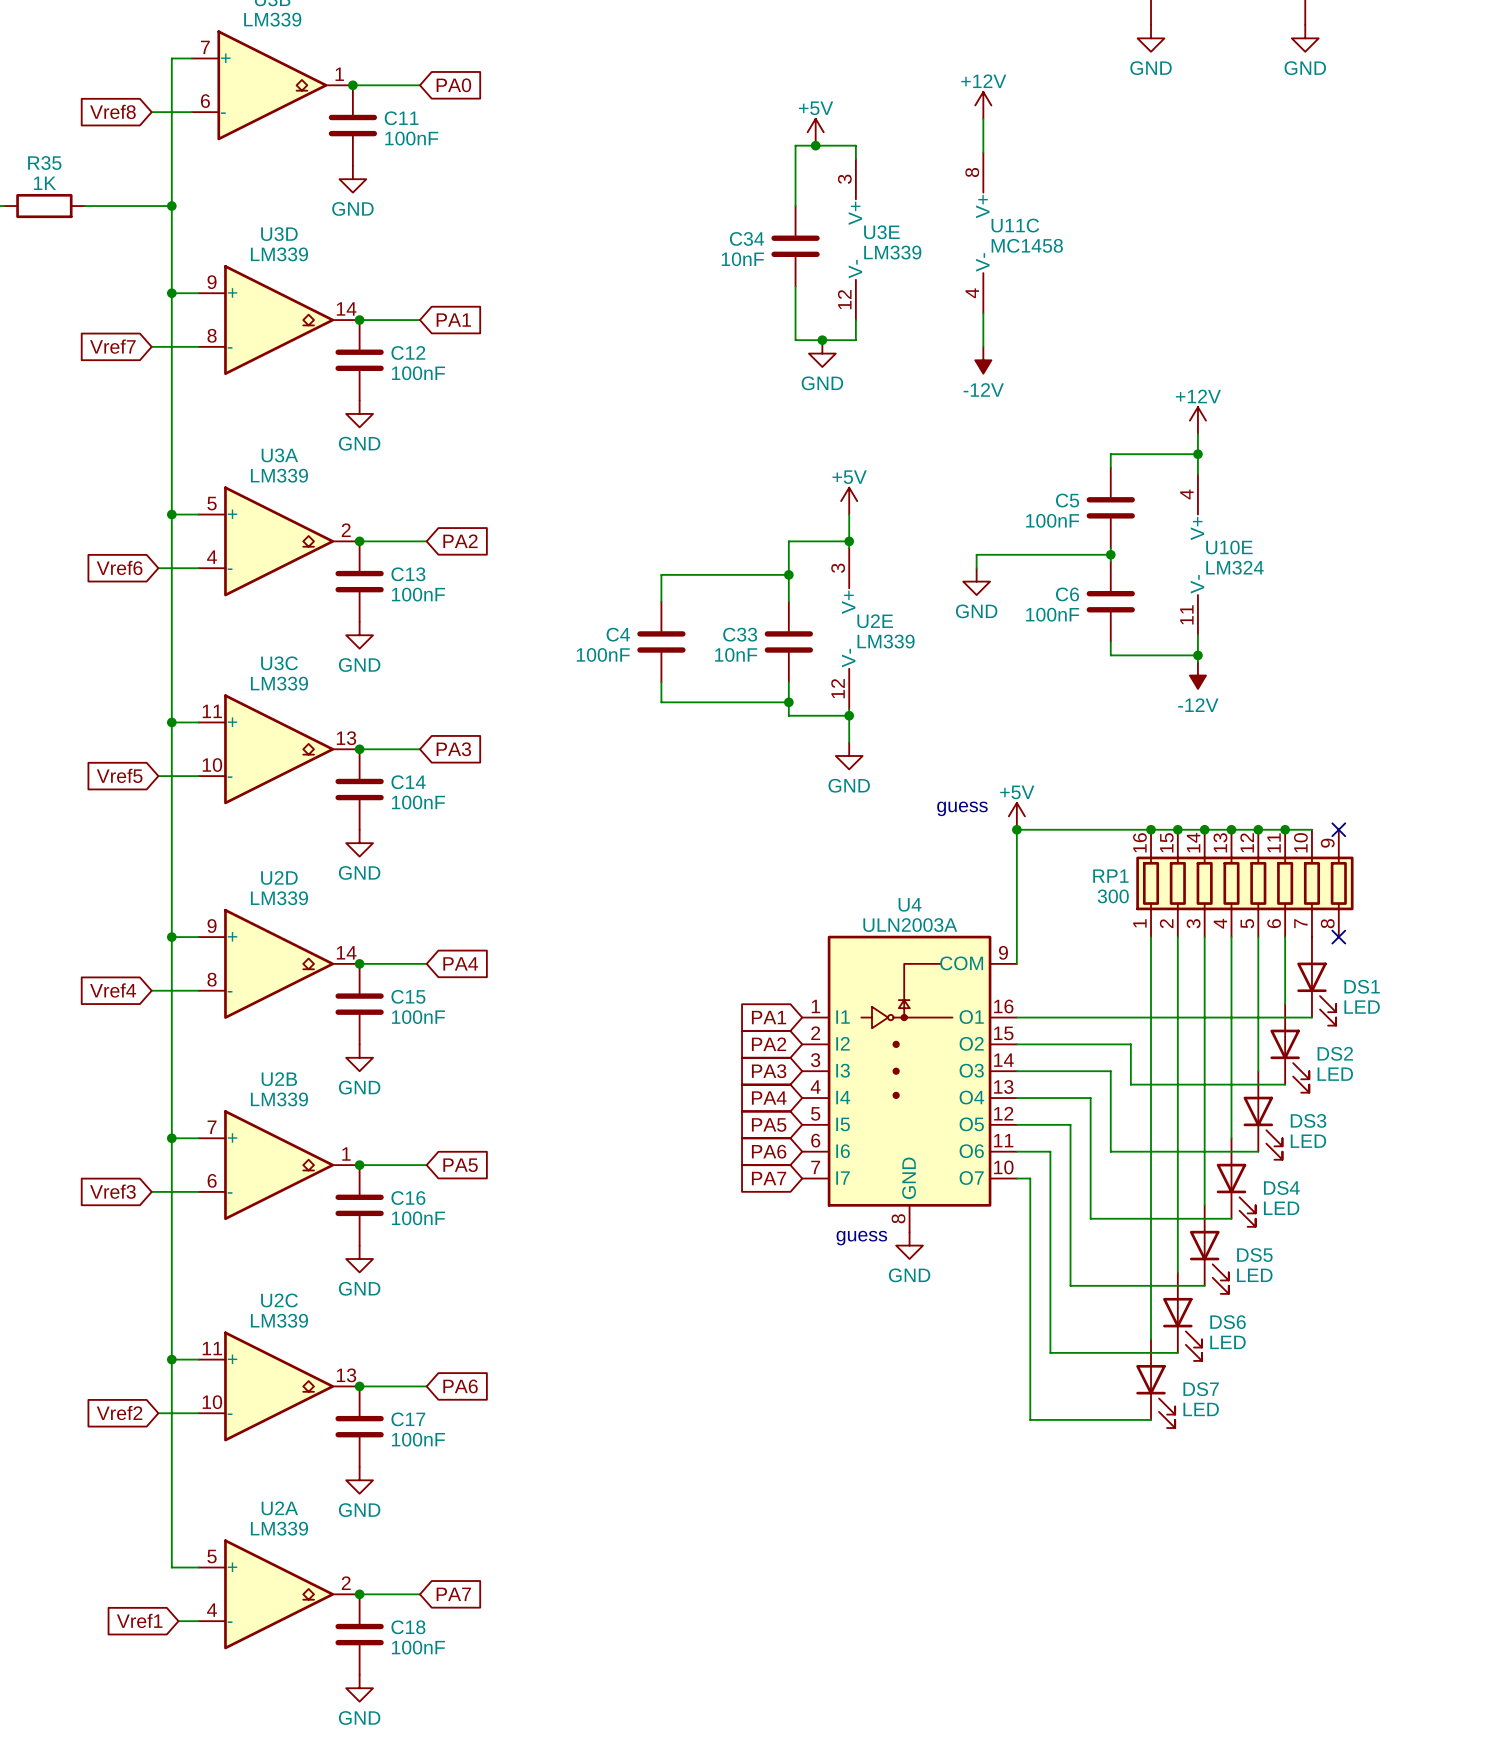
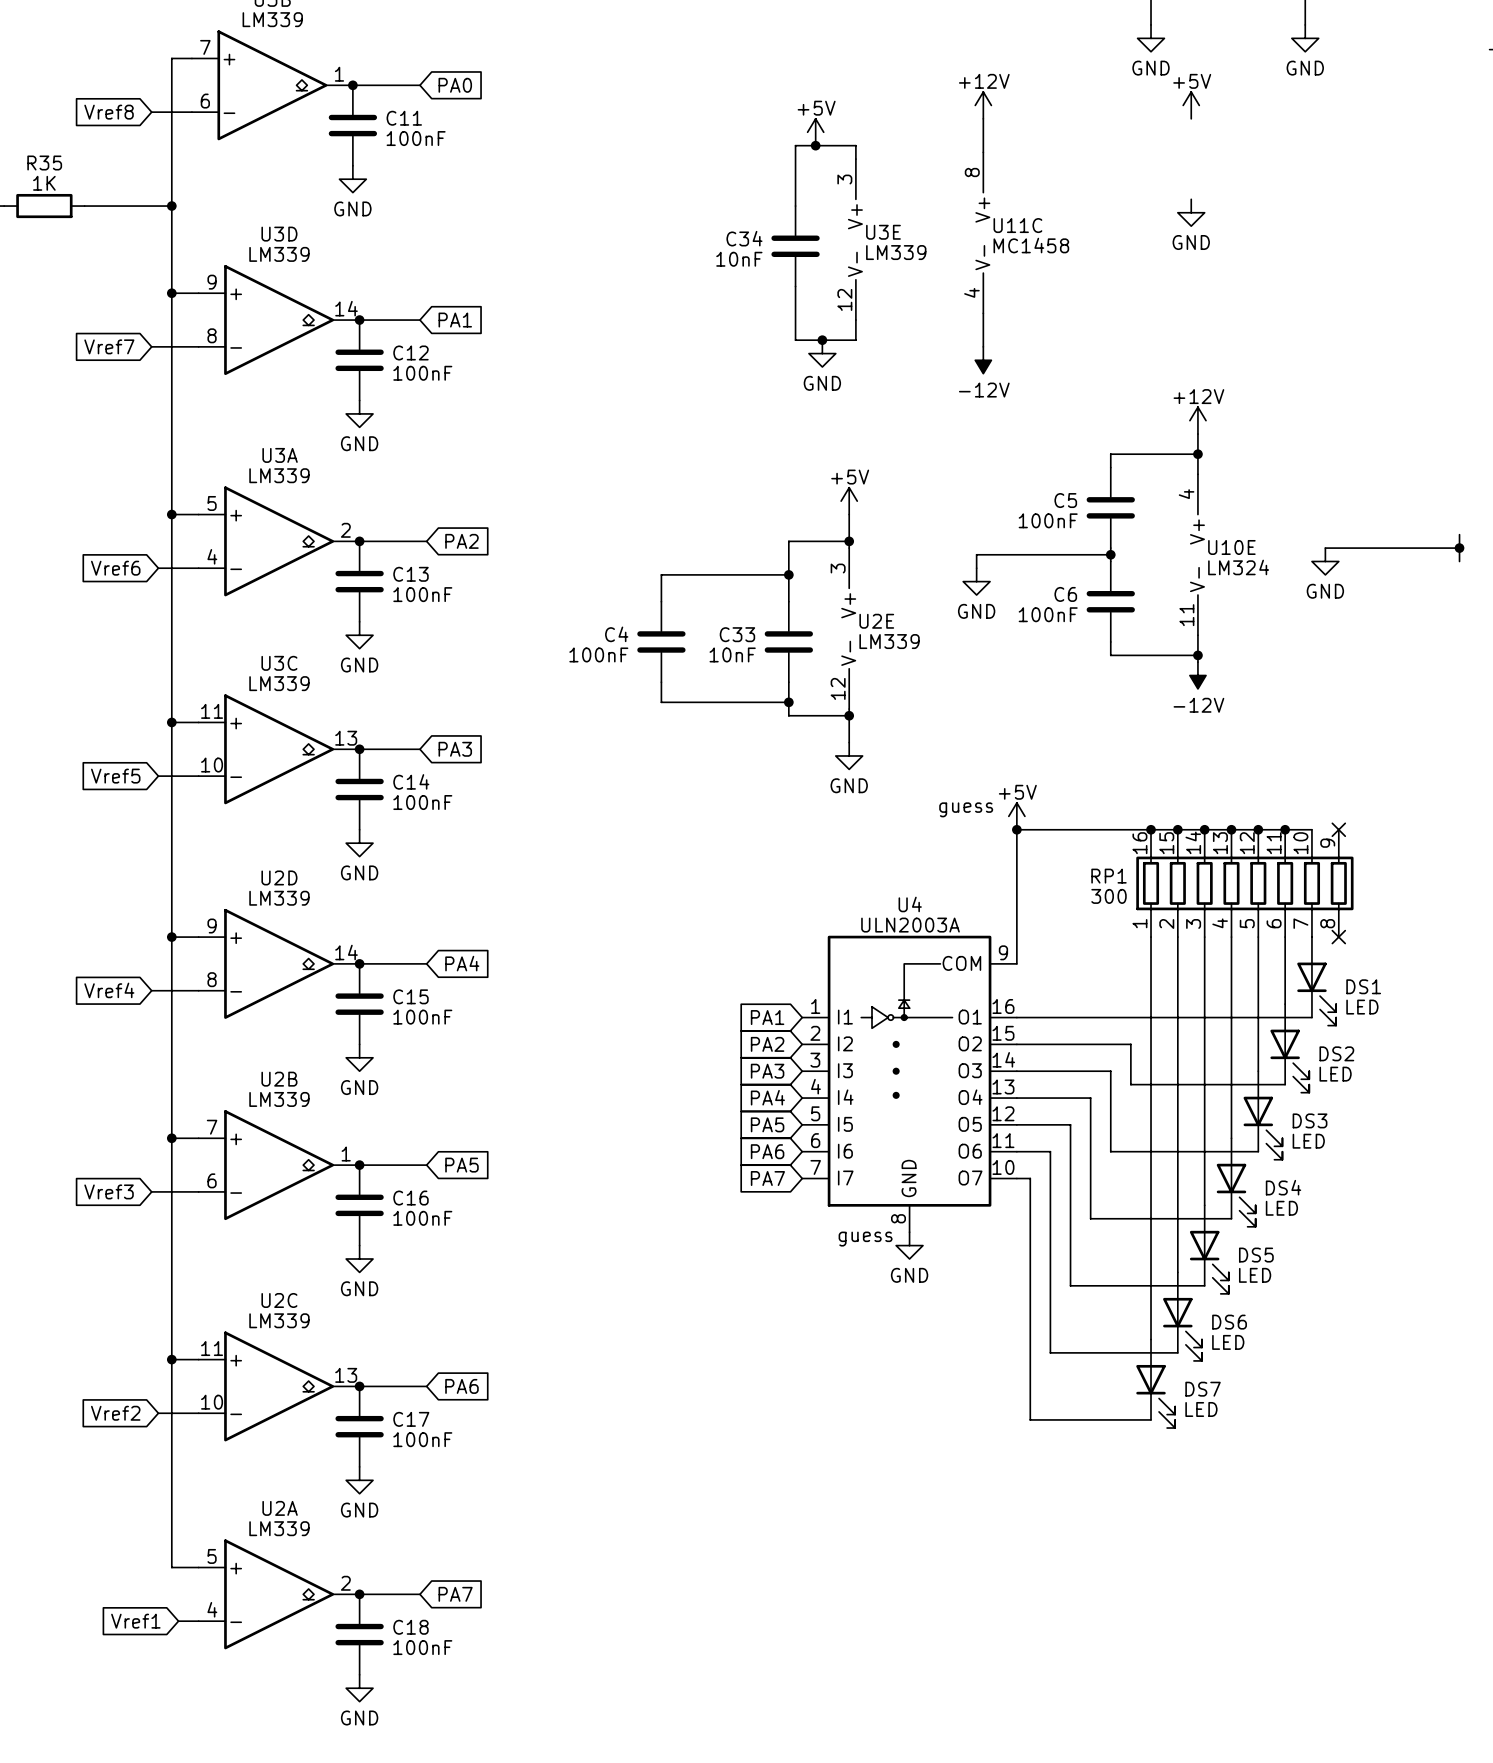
power symbol: none -> +5V (1191, 105)
power symbol: none -> GND (1191, 212)
wire: none -> (1459, 534) (1459, 561)
wire: none -> (1325, 548) (1459, 548)
junction: none -> (1459, 548)
power symbol: none -> GND (1325, 561)

